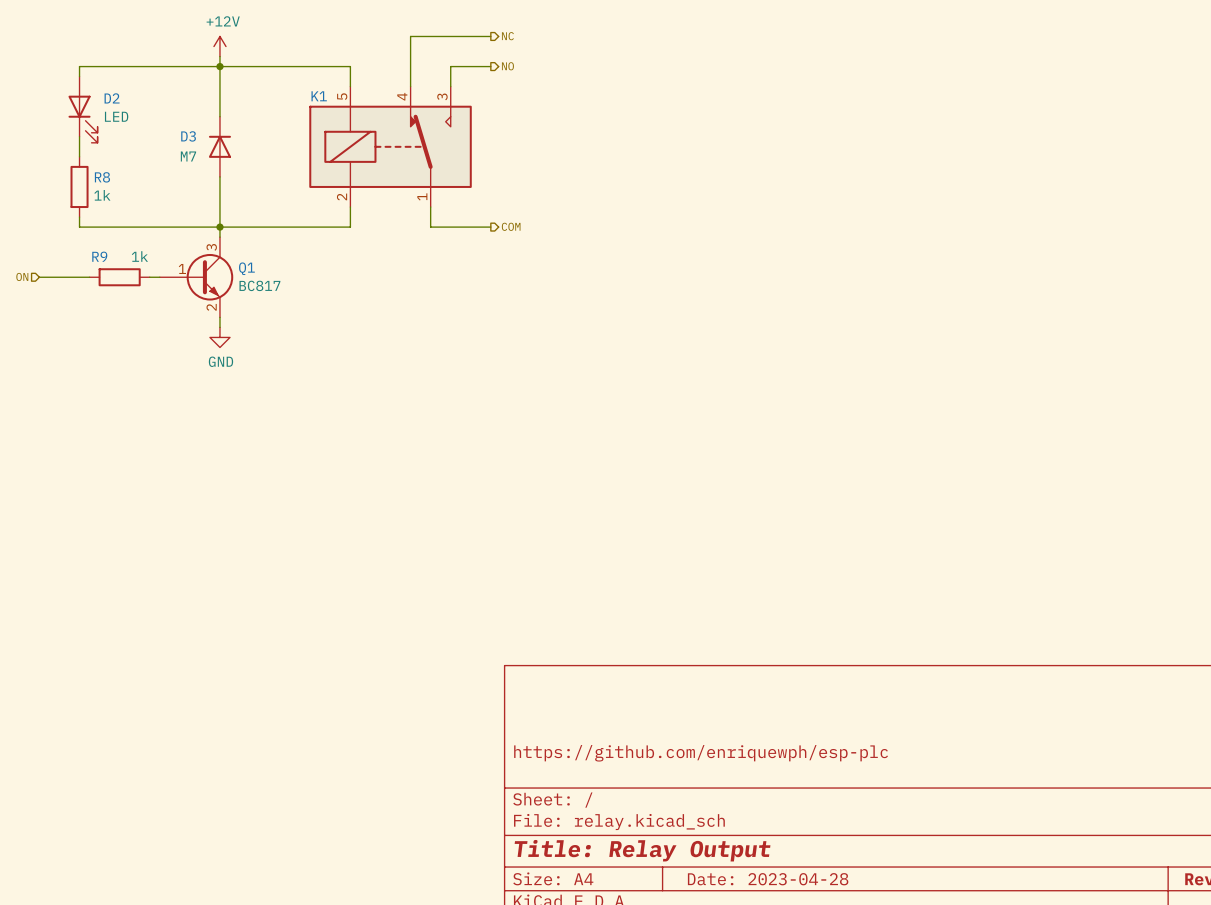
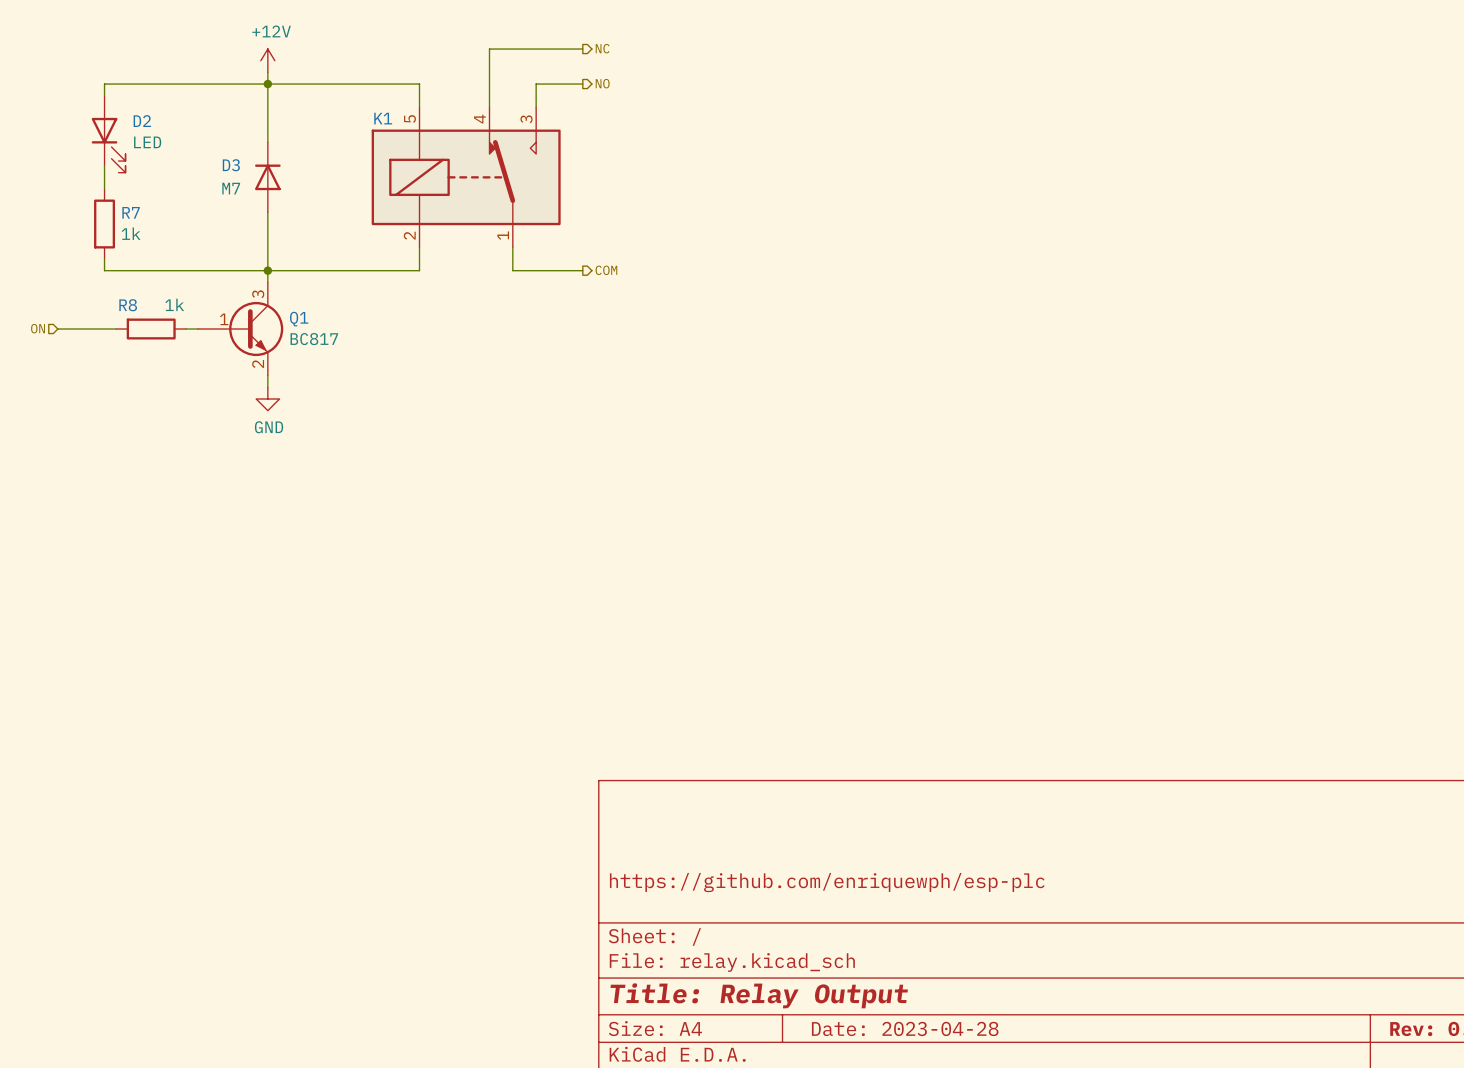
R8 name: R8 (102, 177) -> R7 (131, 212)
R9 name: R9 (99, 256) -> R8 (128, 305)

